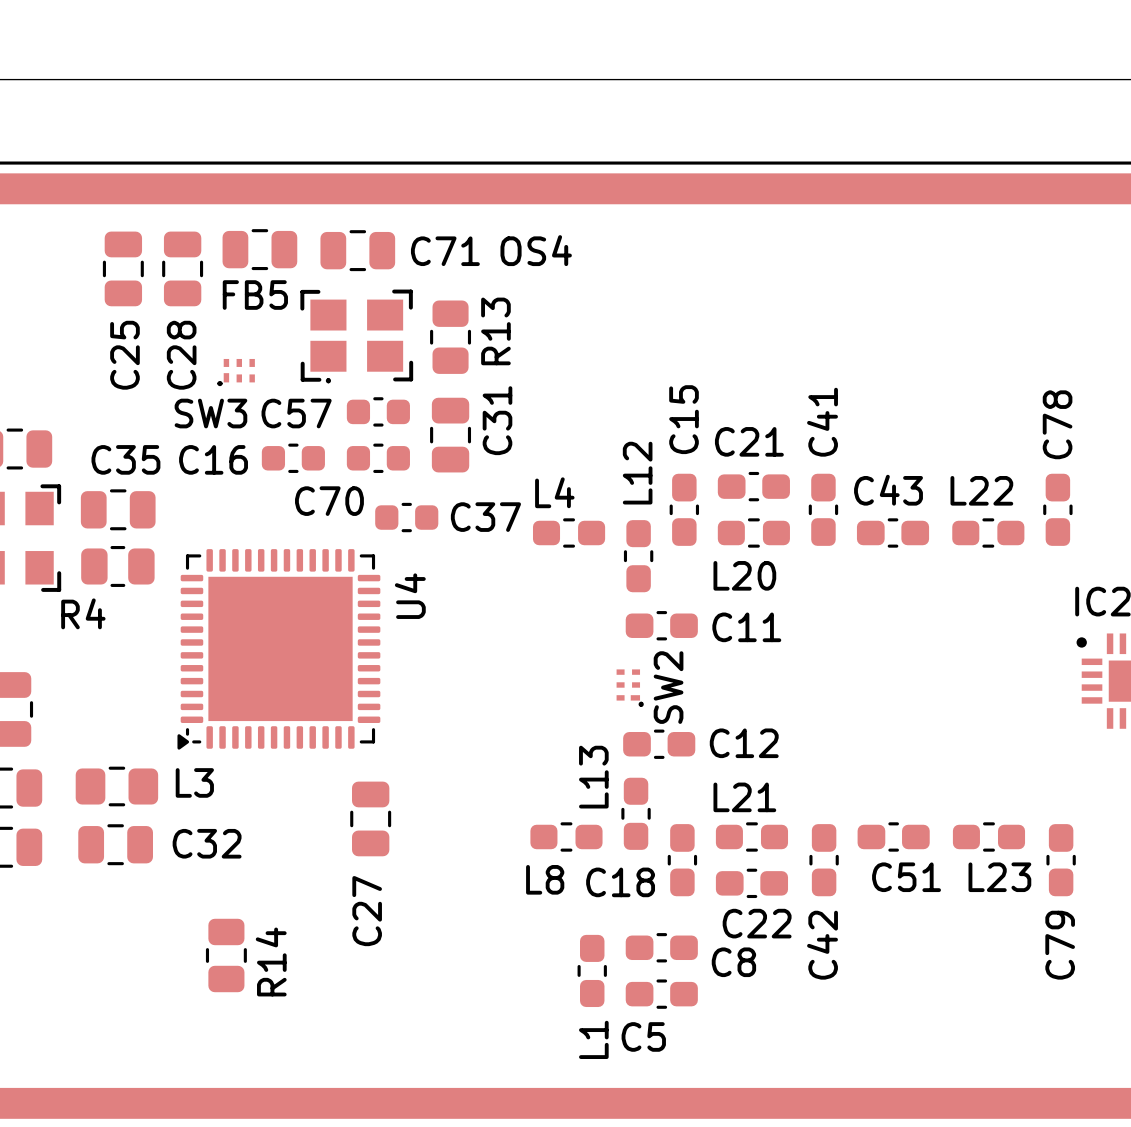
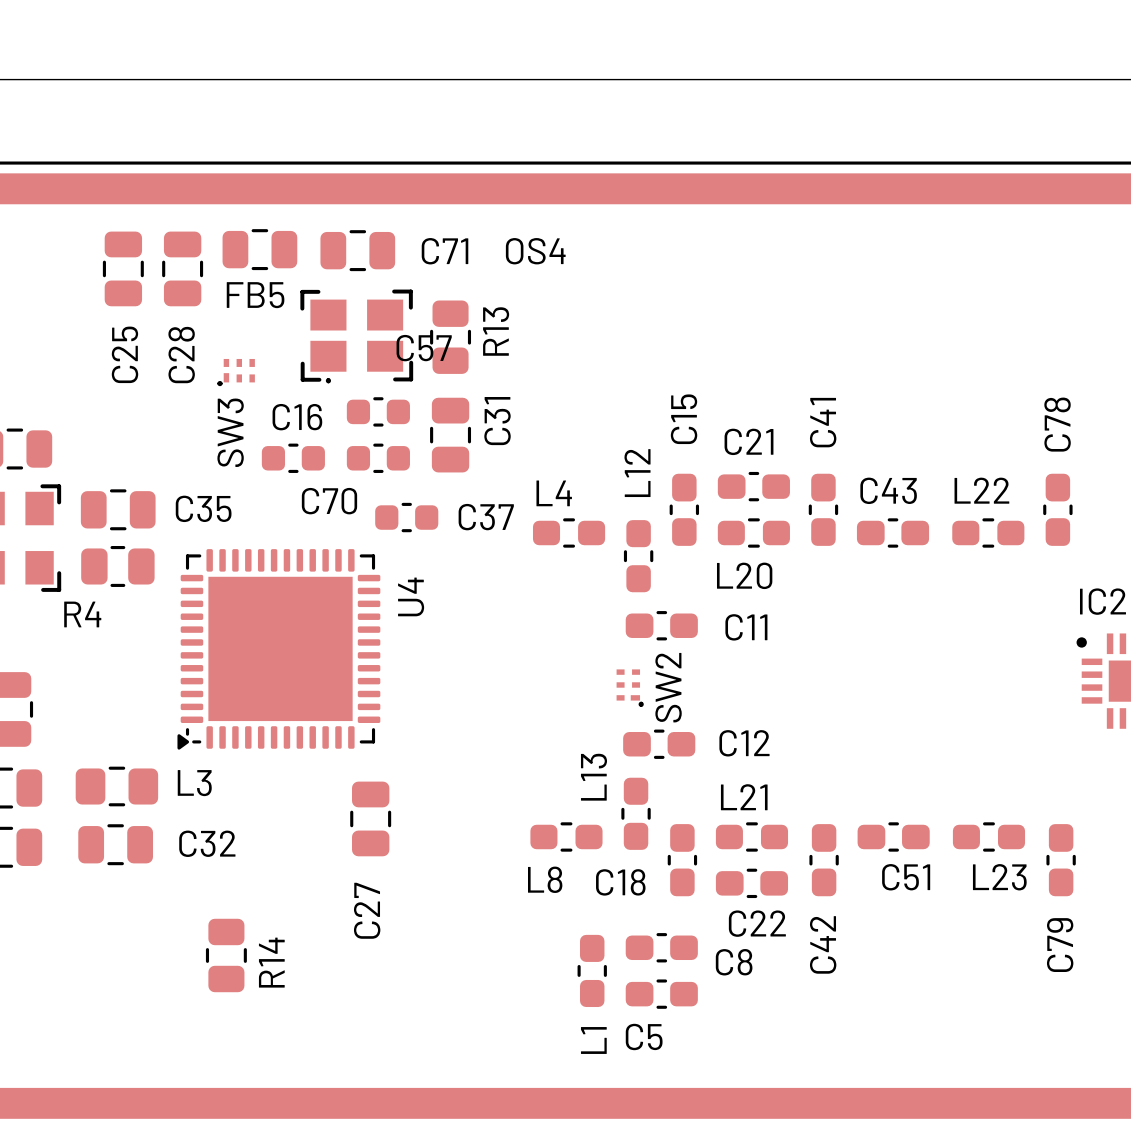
SW3 name rotation: 0° (210, 413) -> 90° counterclockwise (230, 432)
C57 name position: C57 (296, 413) -> C57 (424, 348)
C35 name position: C35 (125, 459) -> C35 (203, 508)
C16 name position: C16 (213, 459) -> C16 (297, 417)

